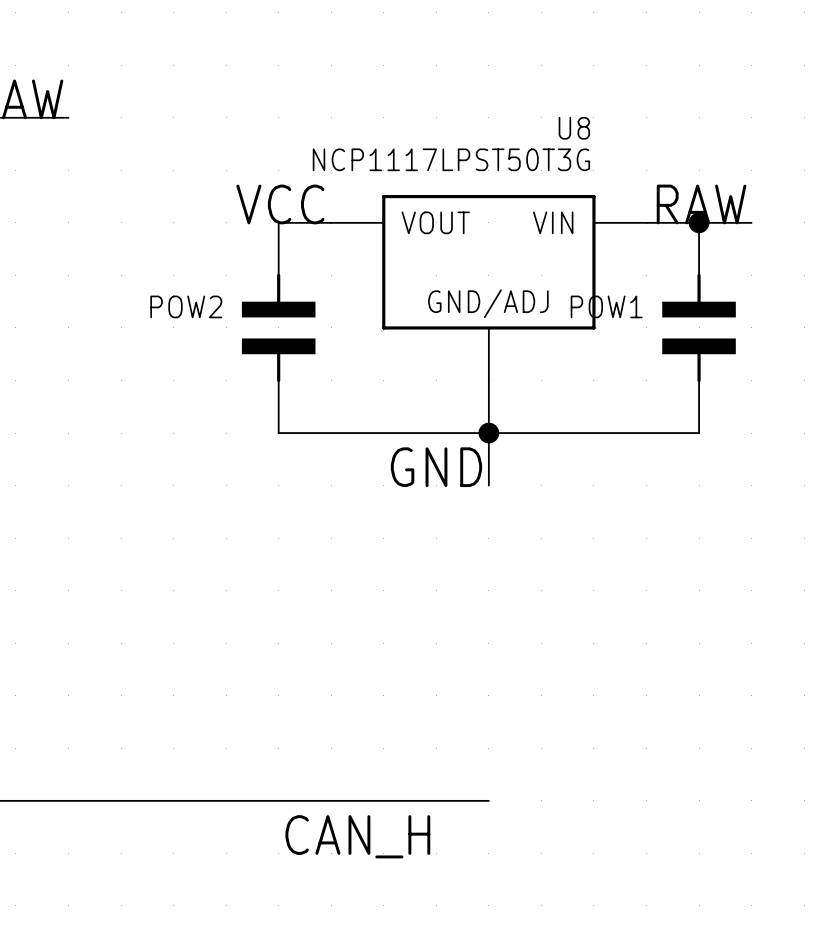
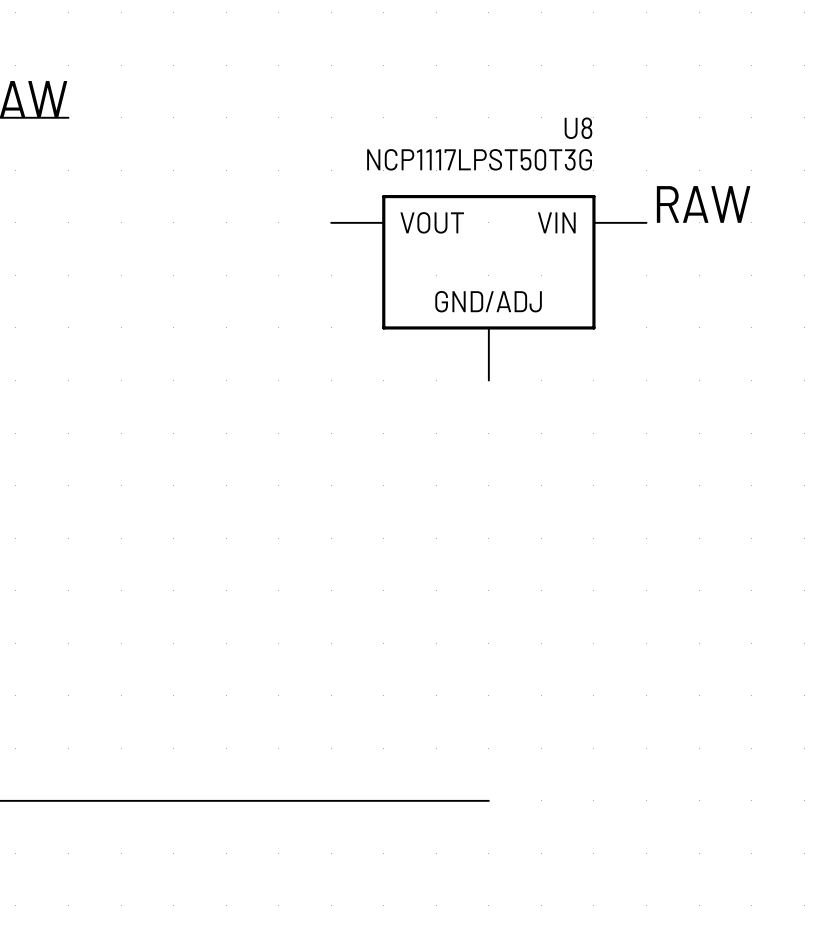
label: VCC (280, 204) -> none
wire: (331, 222) (278, 222) (278, 275) -> none
wire: (646, 222) (751, 222) -> none
wire: (699, 222) (699, 275) -> none
junction: (699, 222) -> none
POW2: (278, 327) -> none
POW1: (699, 327) -> none
wire: (278, 380) (278, 433) (699, 433) (699, 380) -> none
wire: (488, 380) (488, 485) -> none
junction: (488, 433) -> none
label: GND (436, 467) -> none
label: CAN_H (357, 836) -> none

